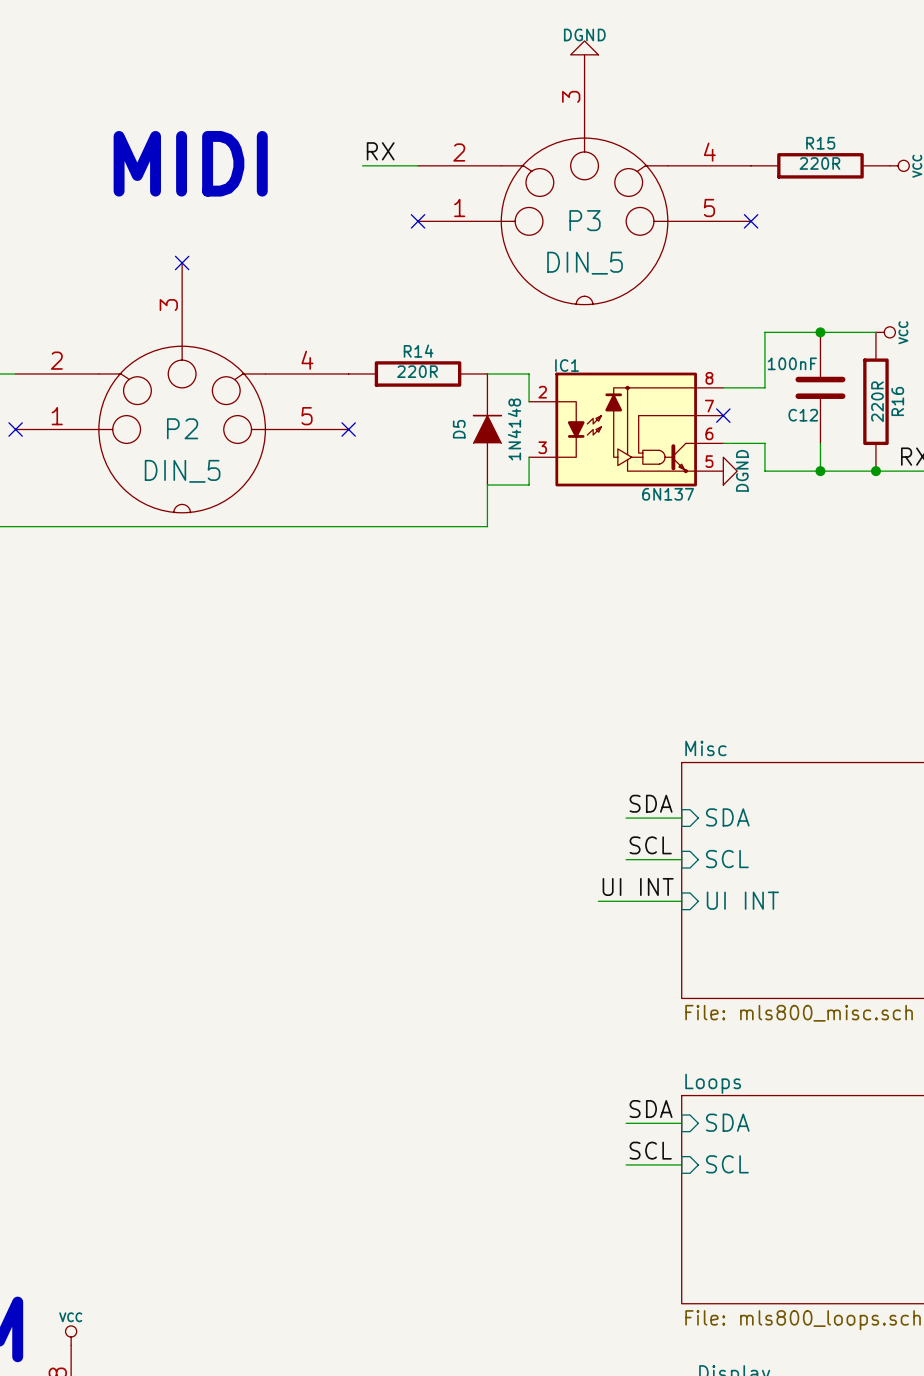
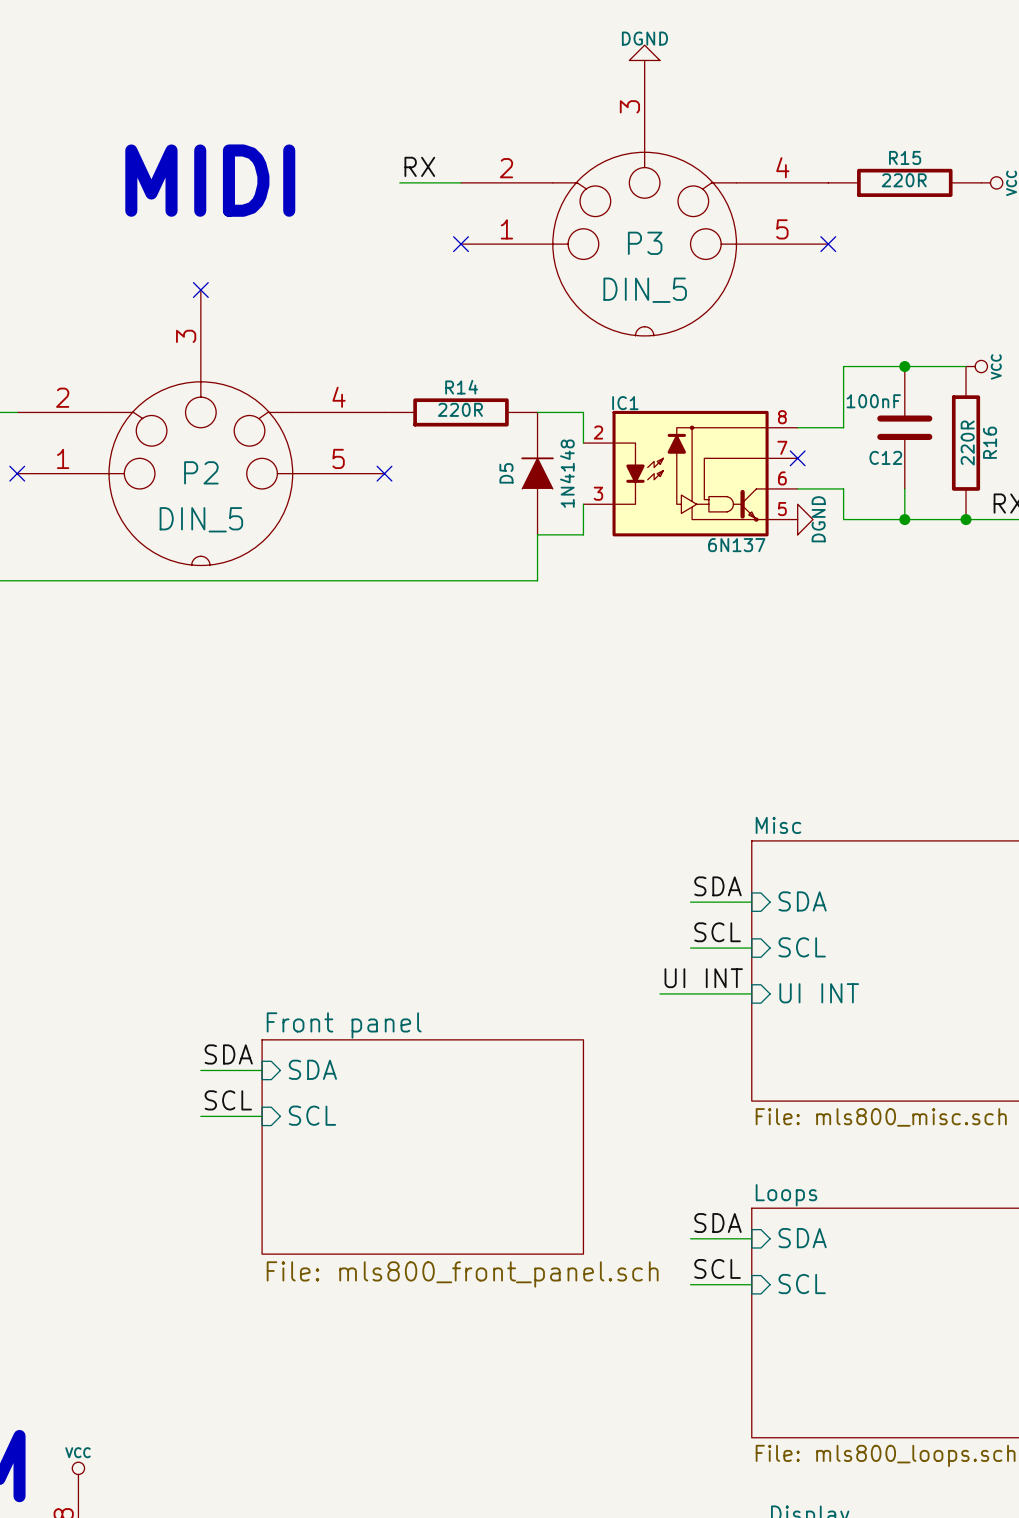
label: none -> SDA (228, 1054)
wire: none -> (200, 1070) (262, 1070)
sheet pin: none -> SDA (312, 1069)
label: none -> SCL (228, 1100)
sheet pin: none -> SCL (312, 1115)
wire: none -> (200, 1116) (262, 1116)
sheet Front panel: none -> File: mls800_front_panel.sch (422, 1146)

